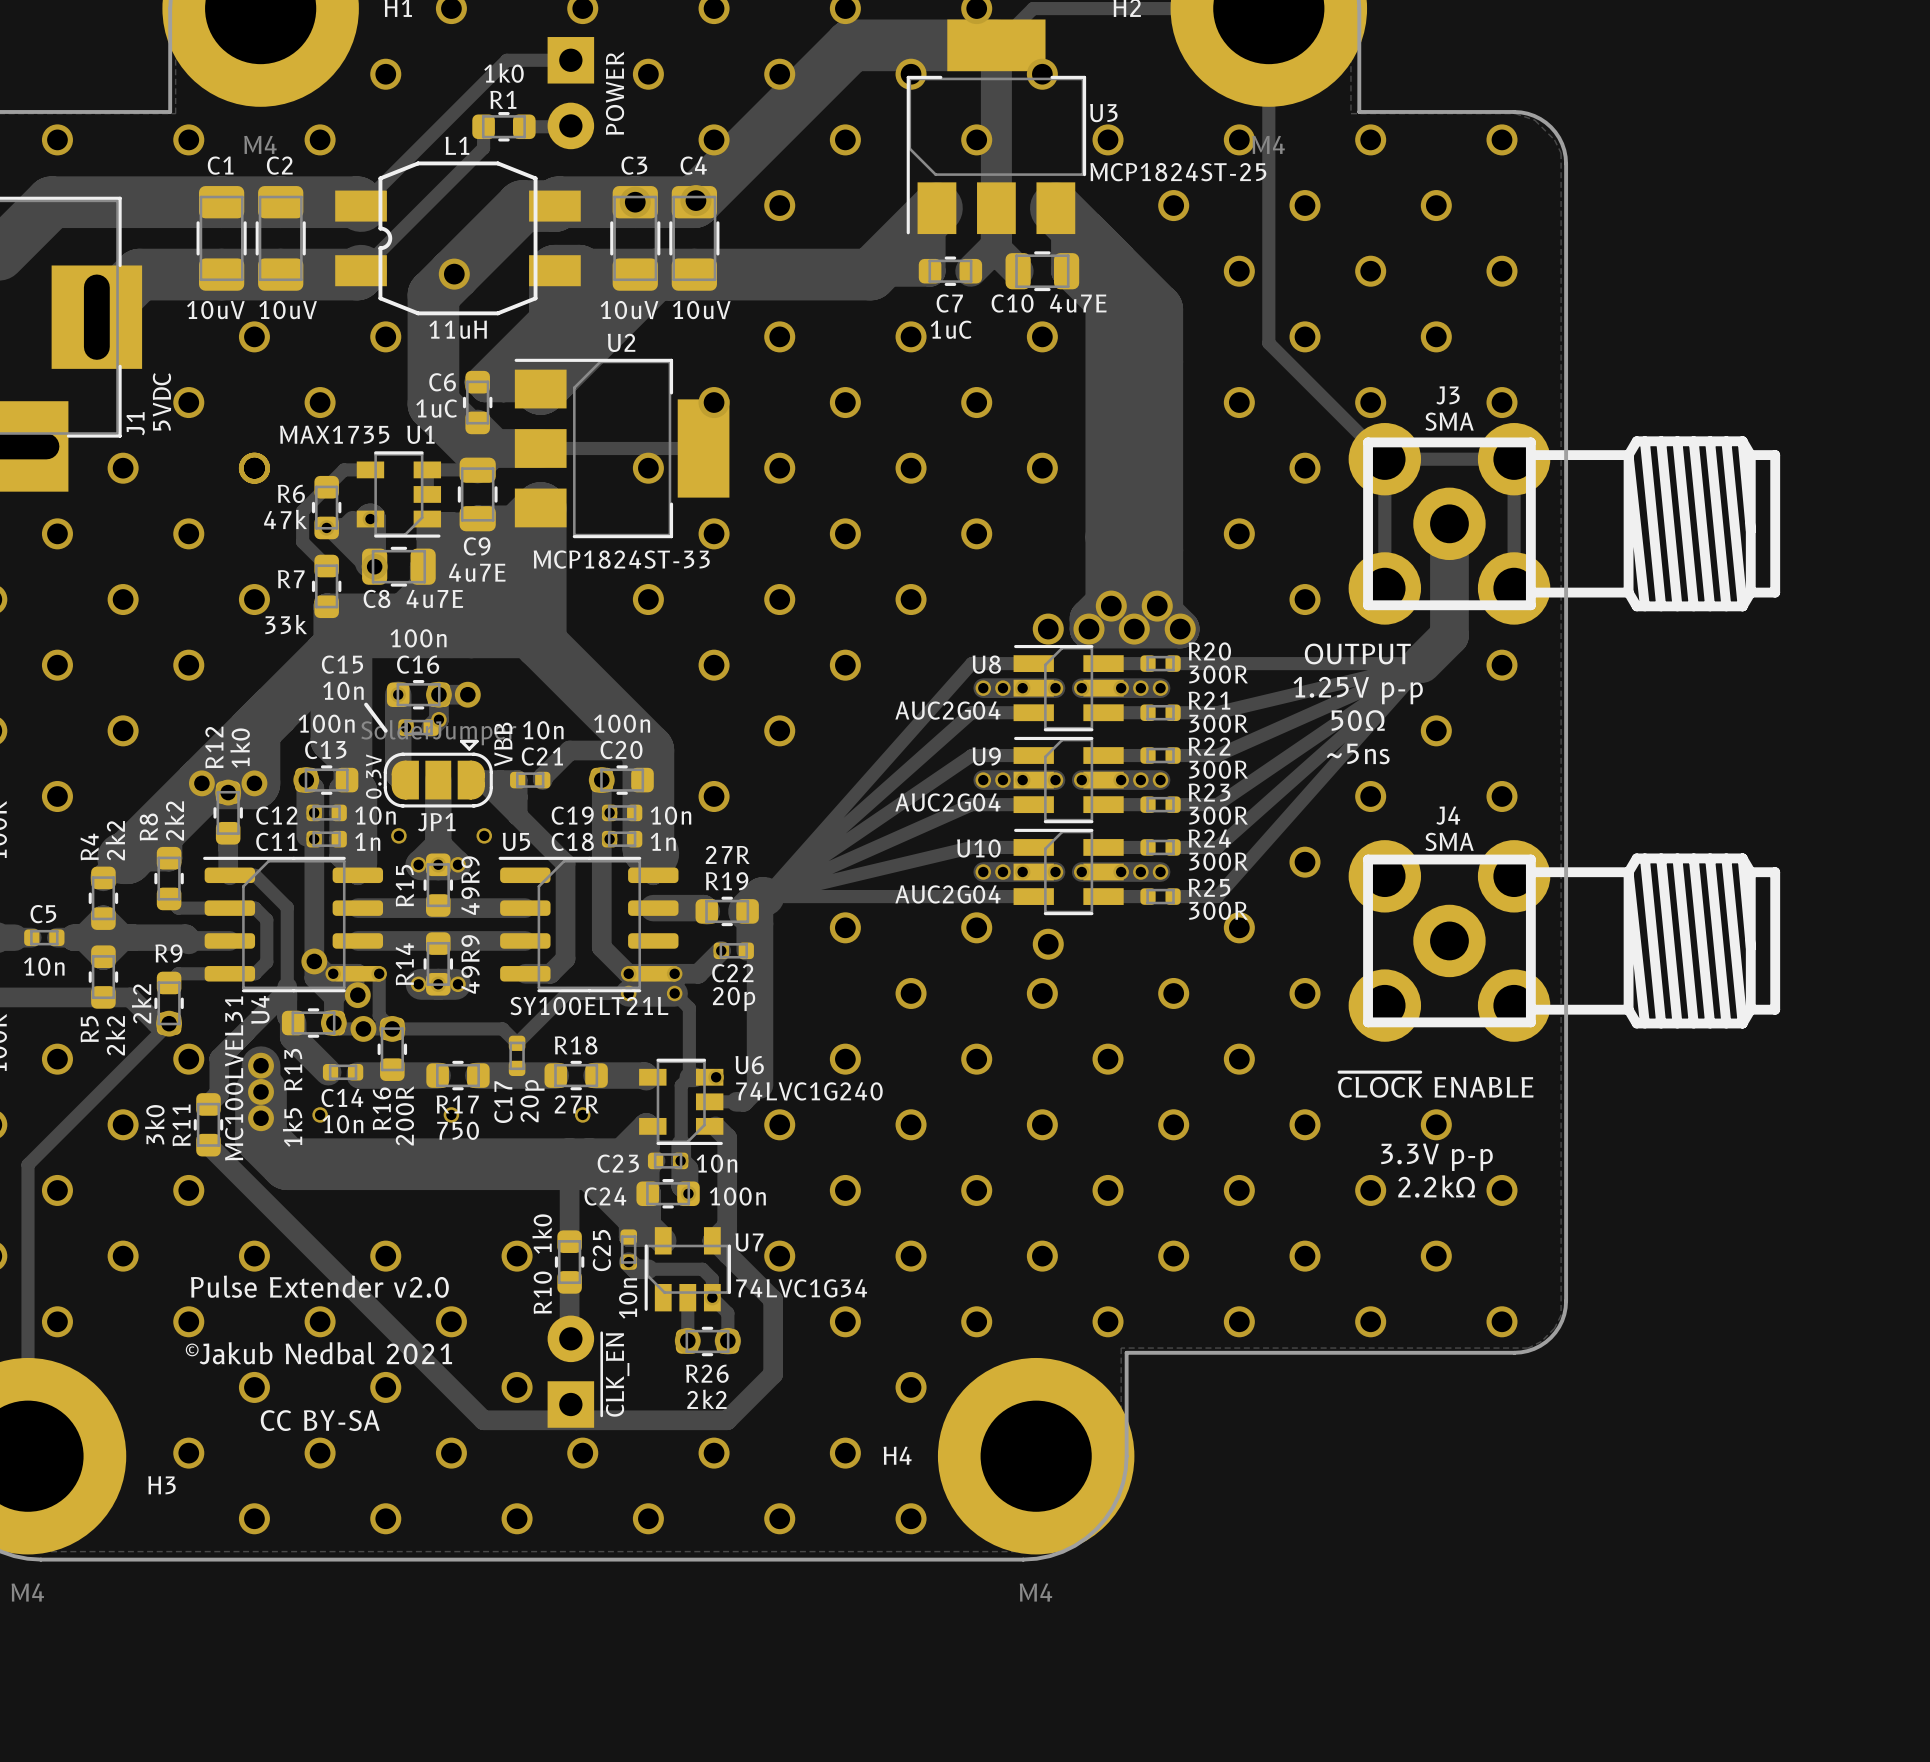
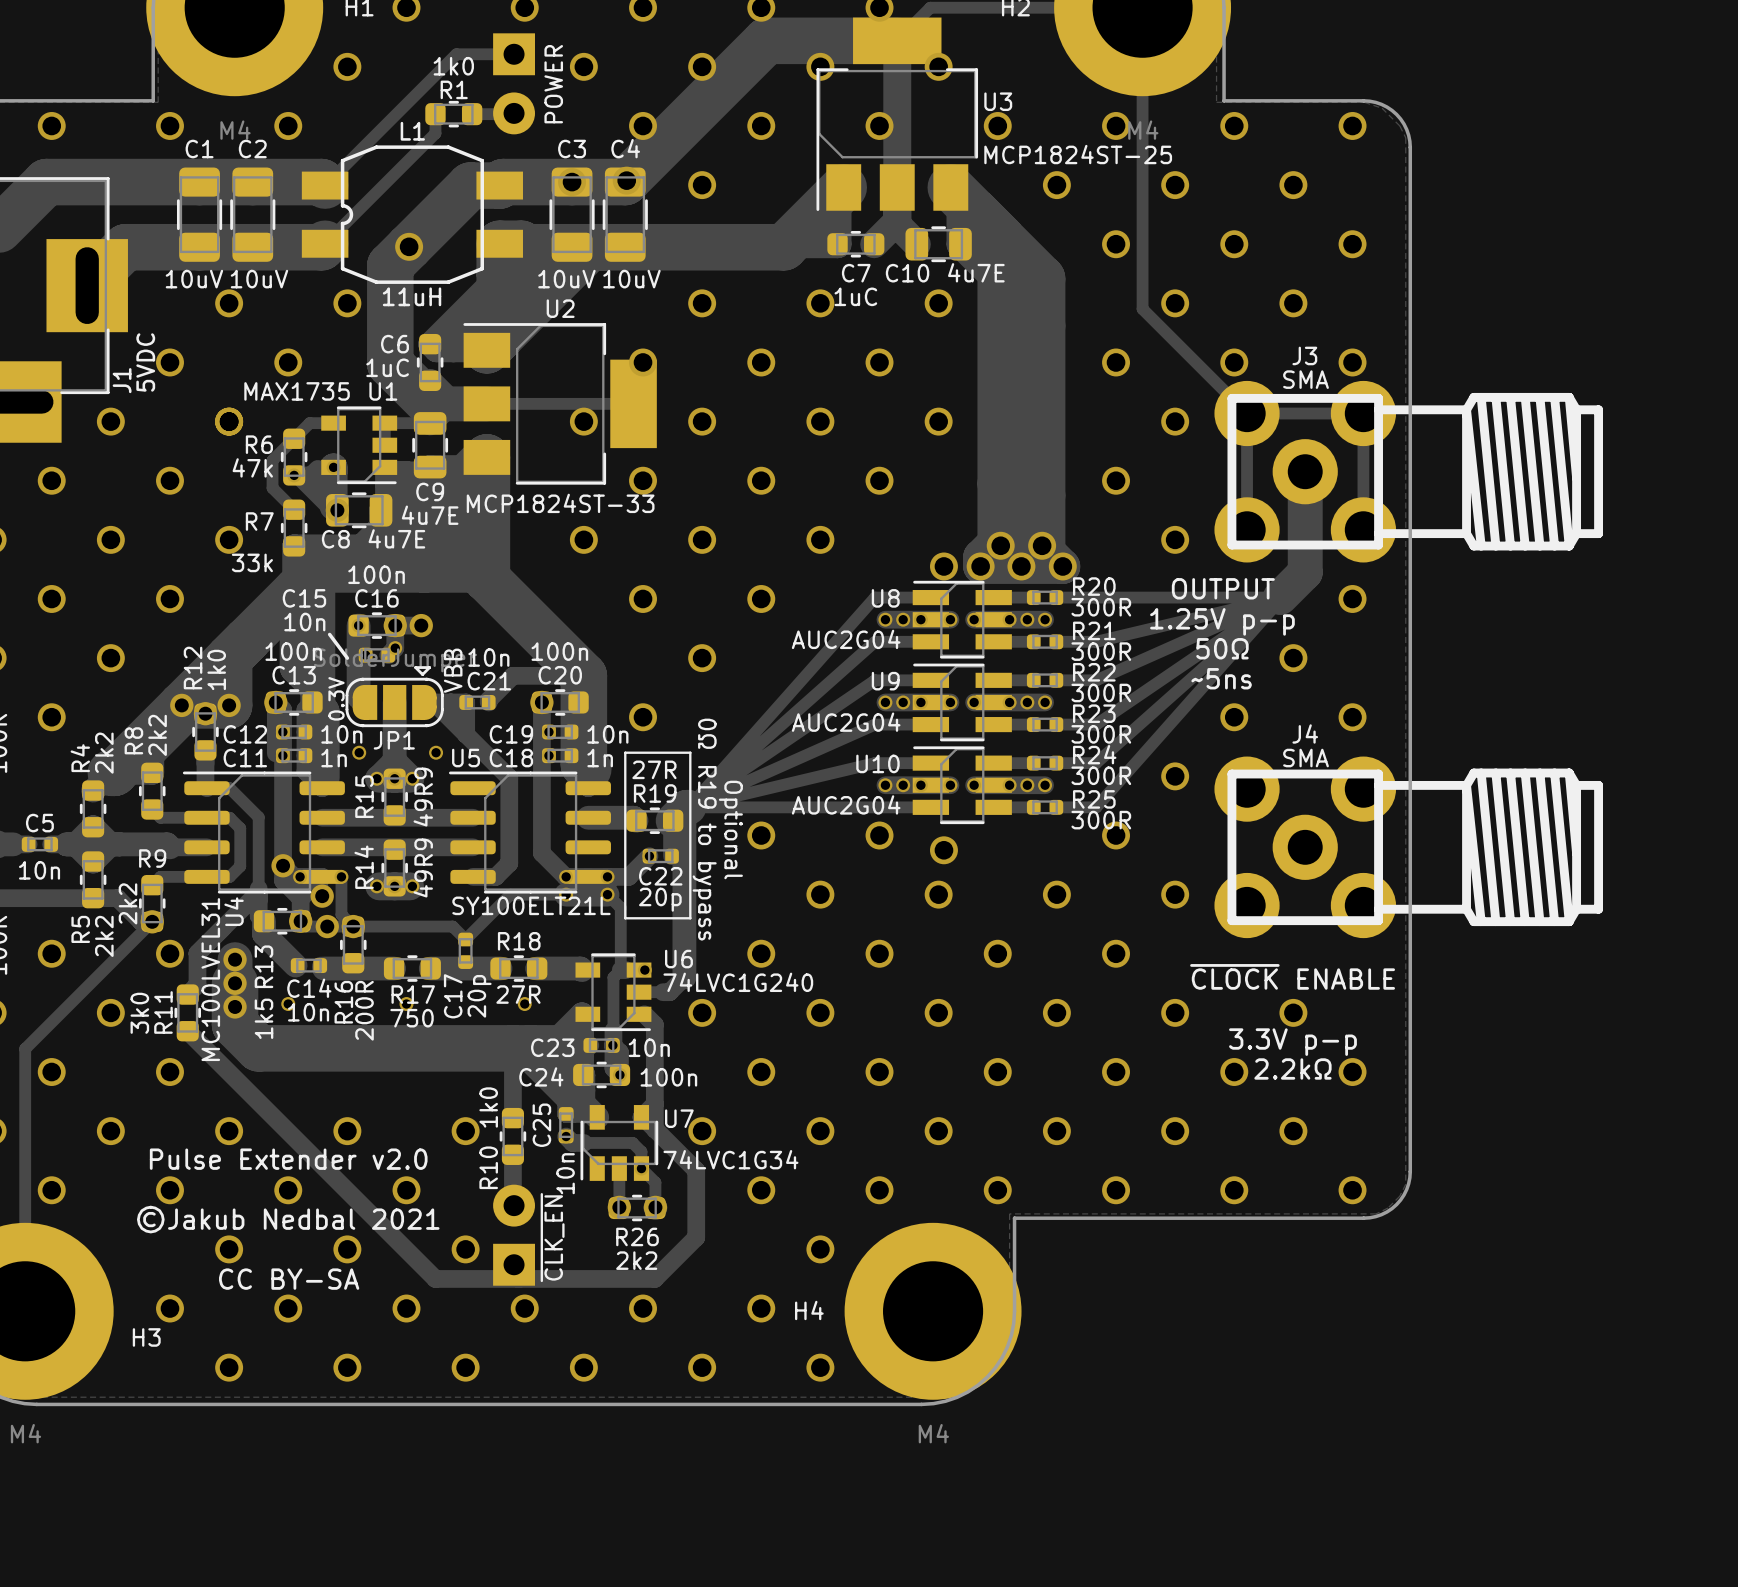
line: none -> (625, 752) (690, 752) (690, 918) (625, 918) (625, 752)
text: none -> 0Ω R19 to bypass (704, 829)
text: none -> Optional (730, 829)

